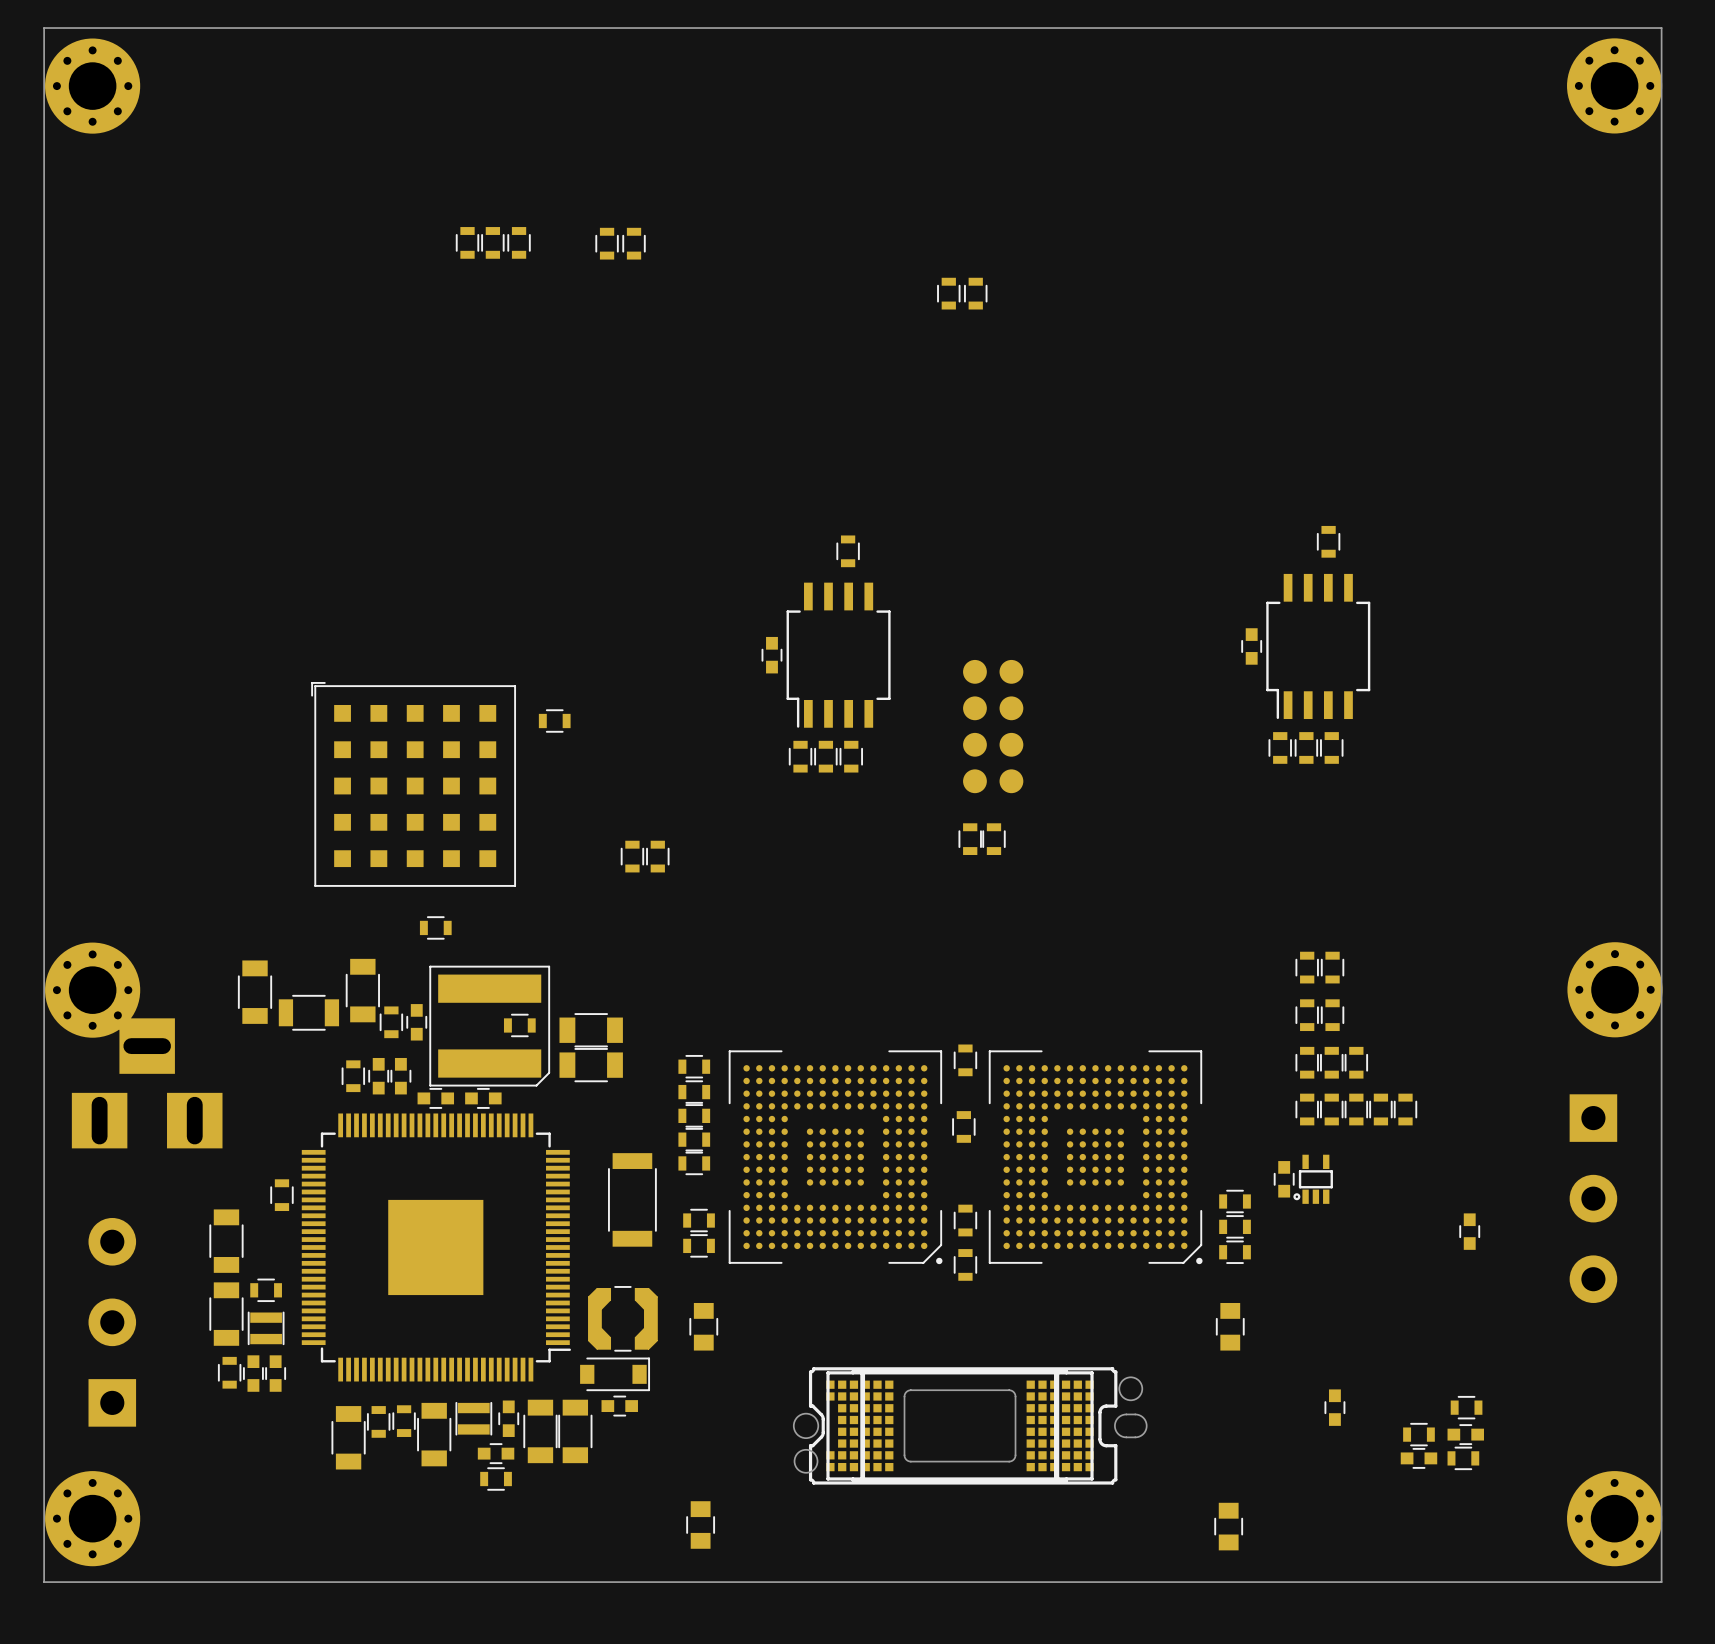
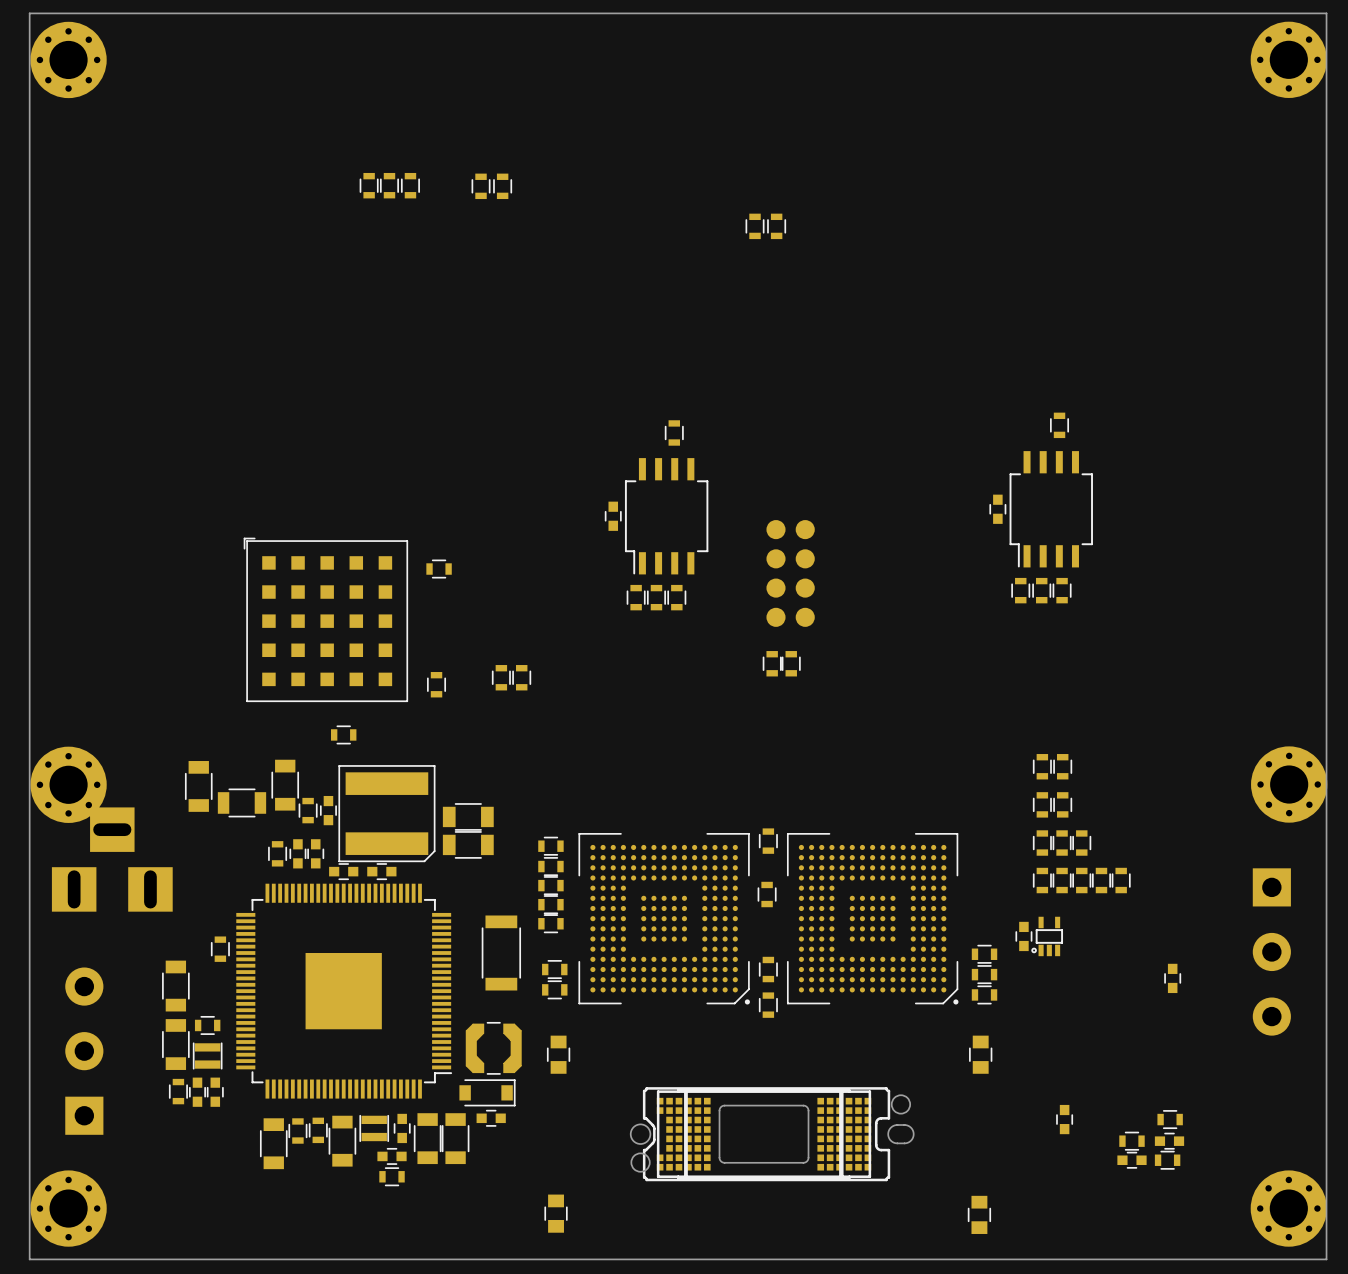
part rotation: 0° (519, 1025) -> 90° clockwise (436, 684)
part position: (519, 1025) -> (436, 684)

